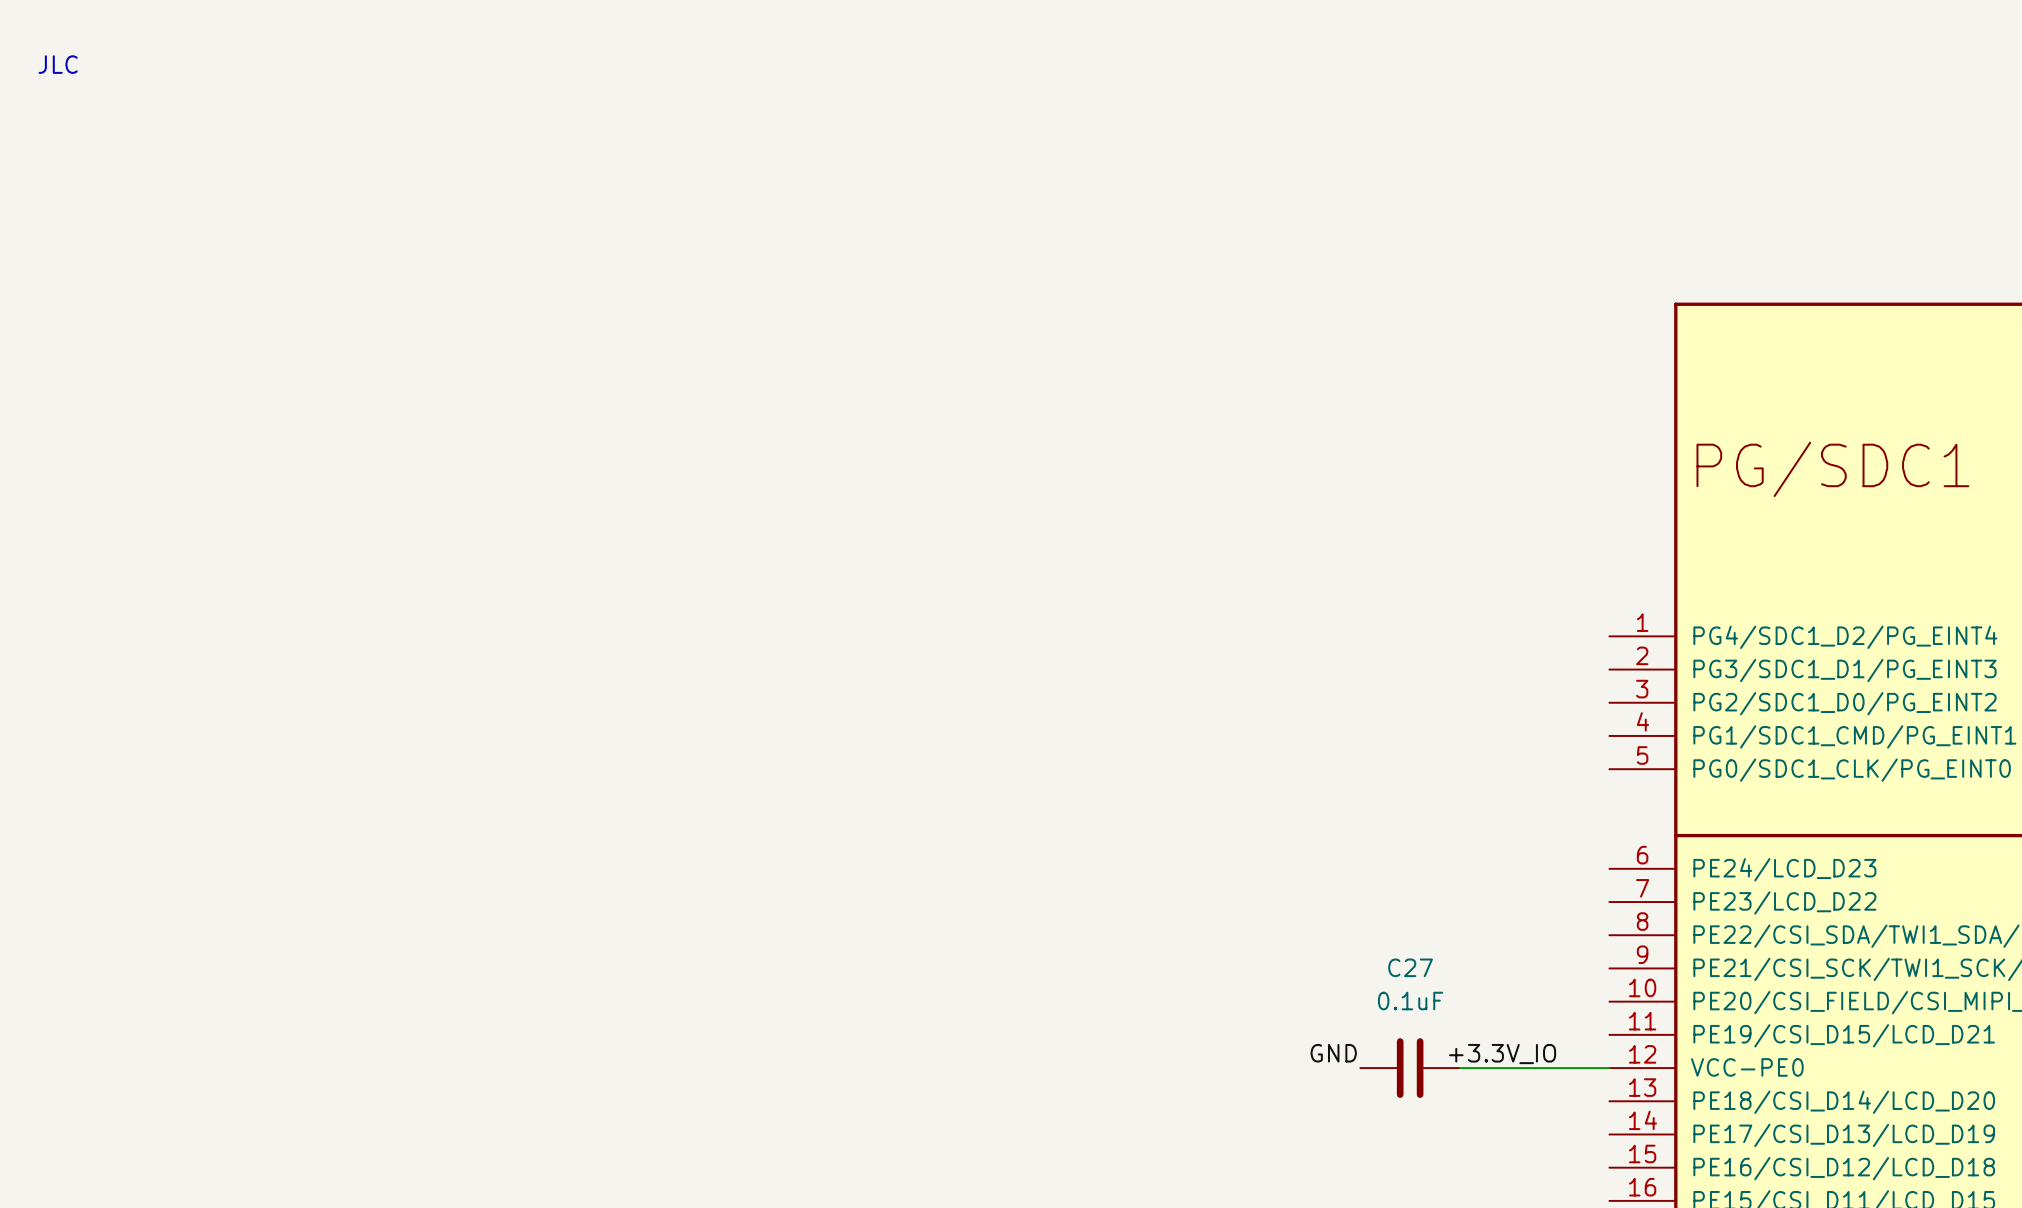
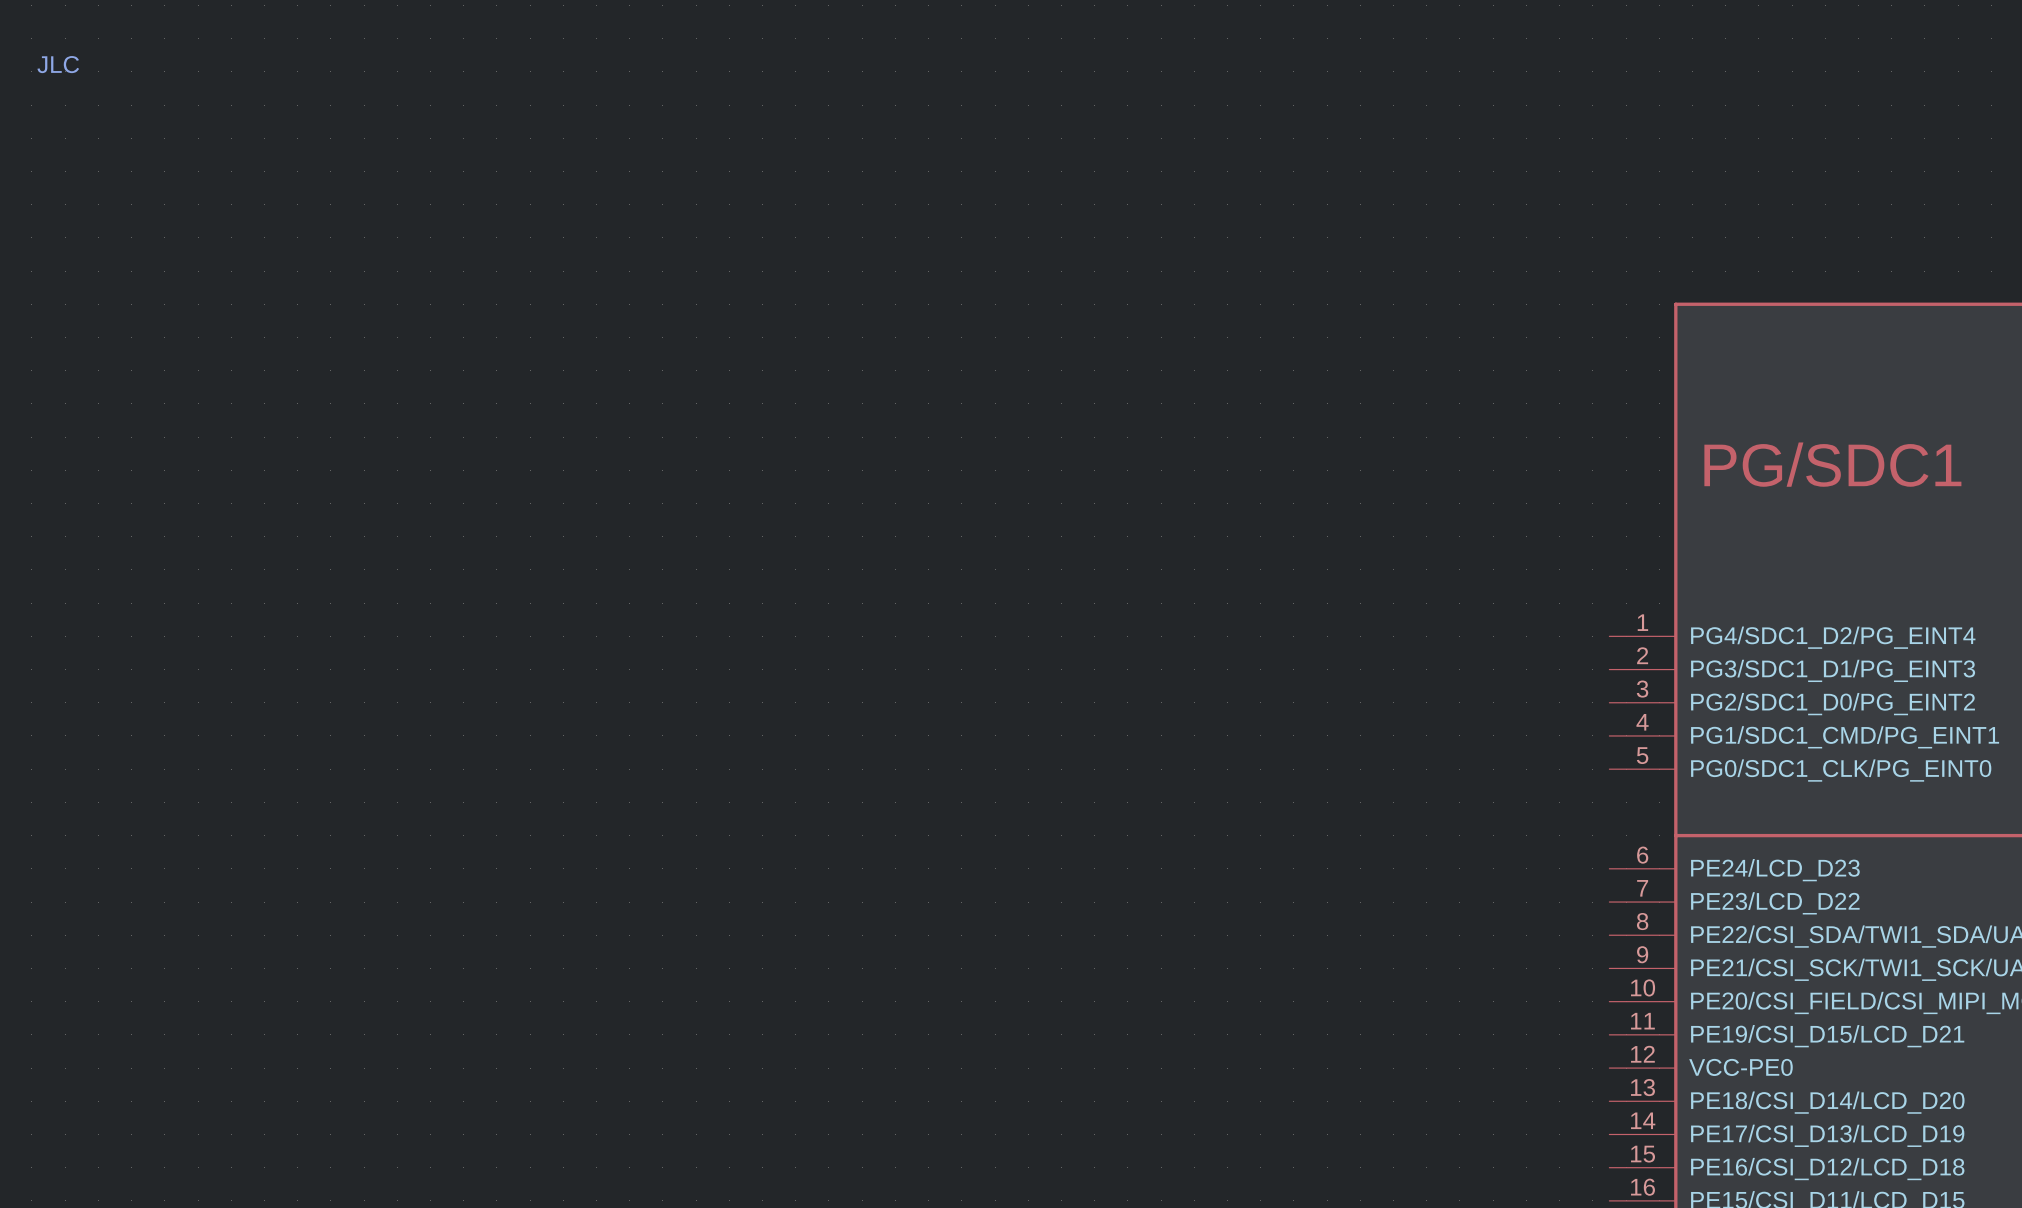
label: GND (1333, 1053) -> none
label: +3.3V_IO (1502, 1054) -> none
C27: 0.1uF (1410, 1068) -> none
wire: (1459, 1068) (1609, 1068) -> none

